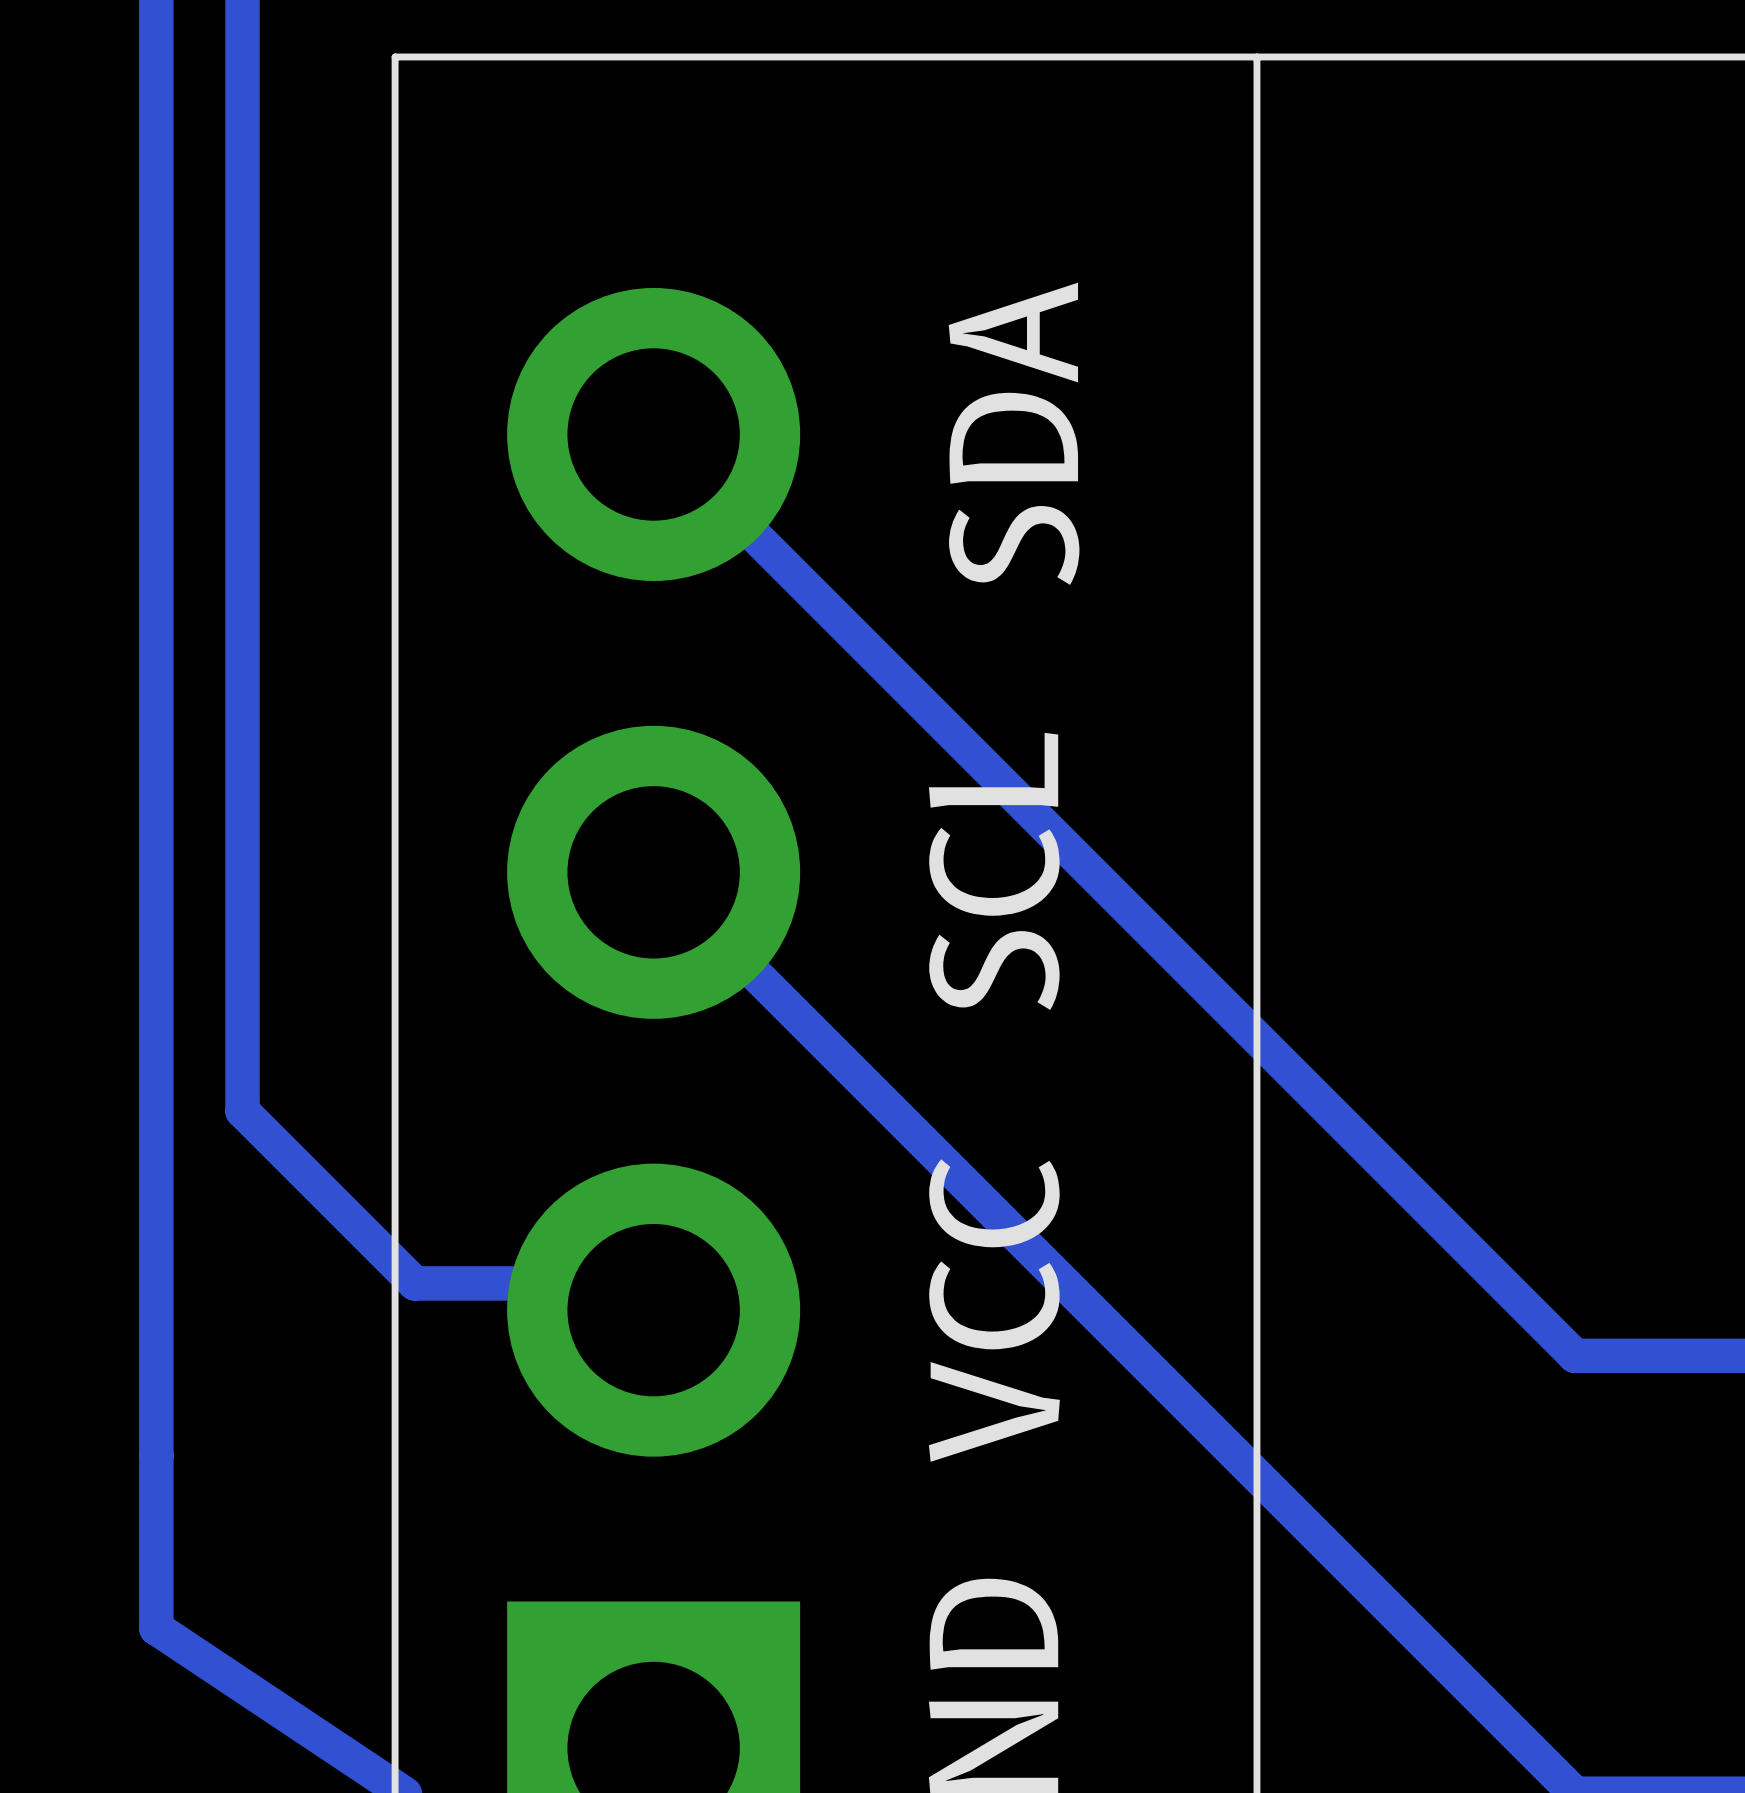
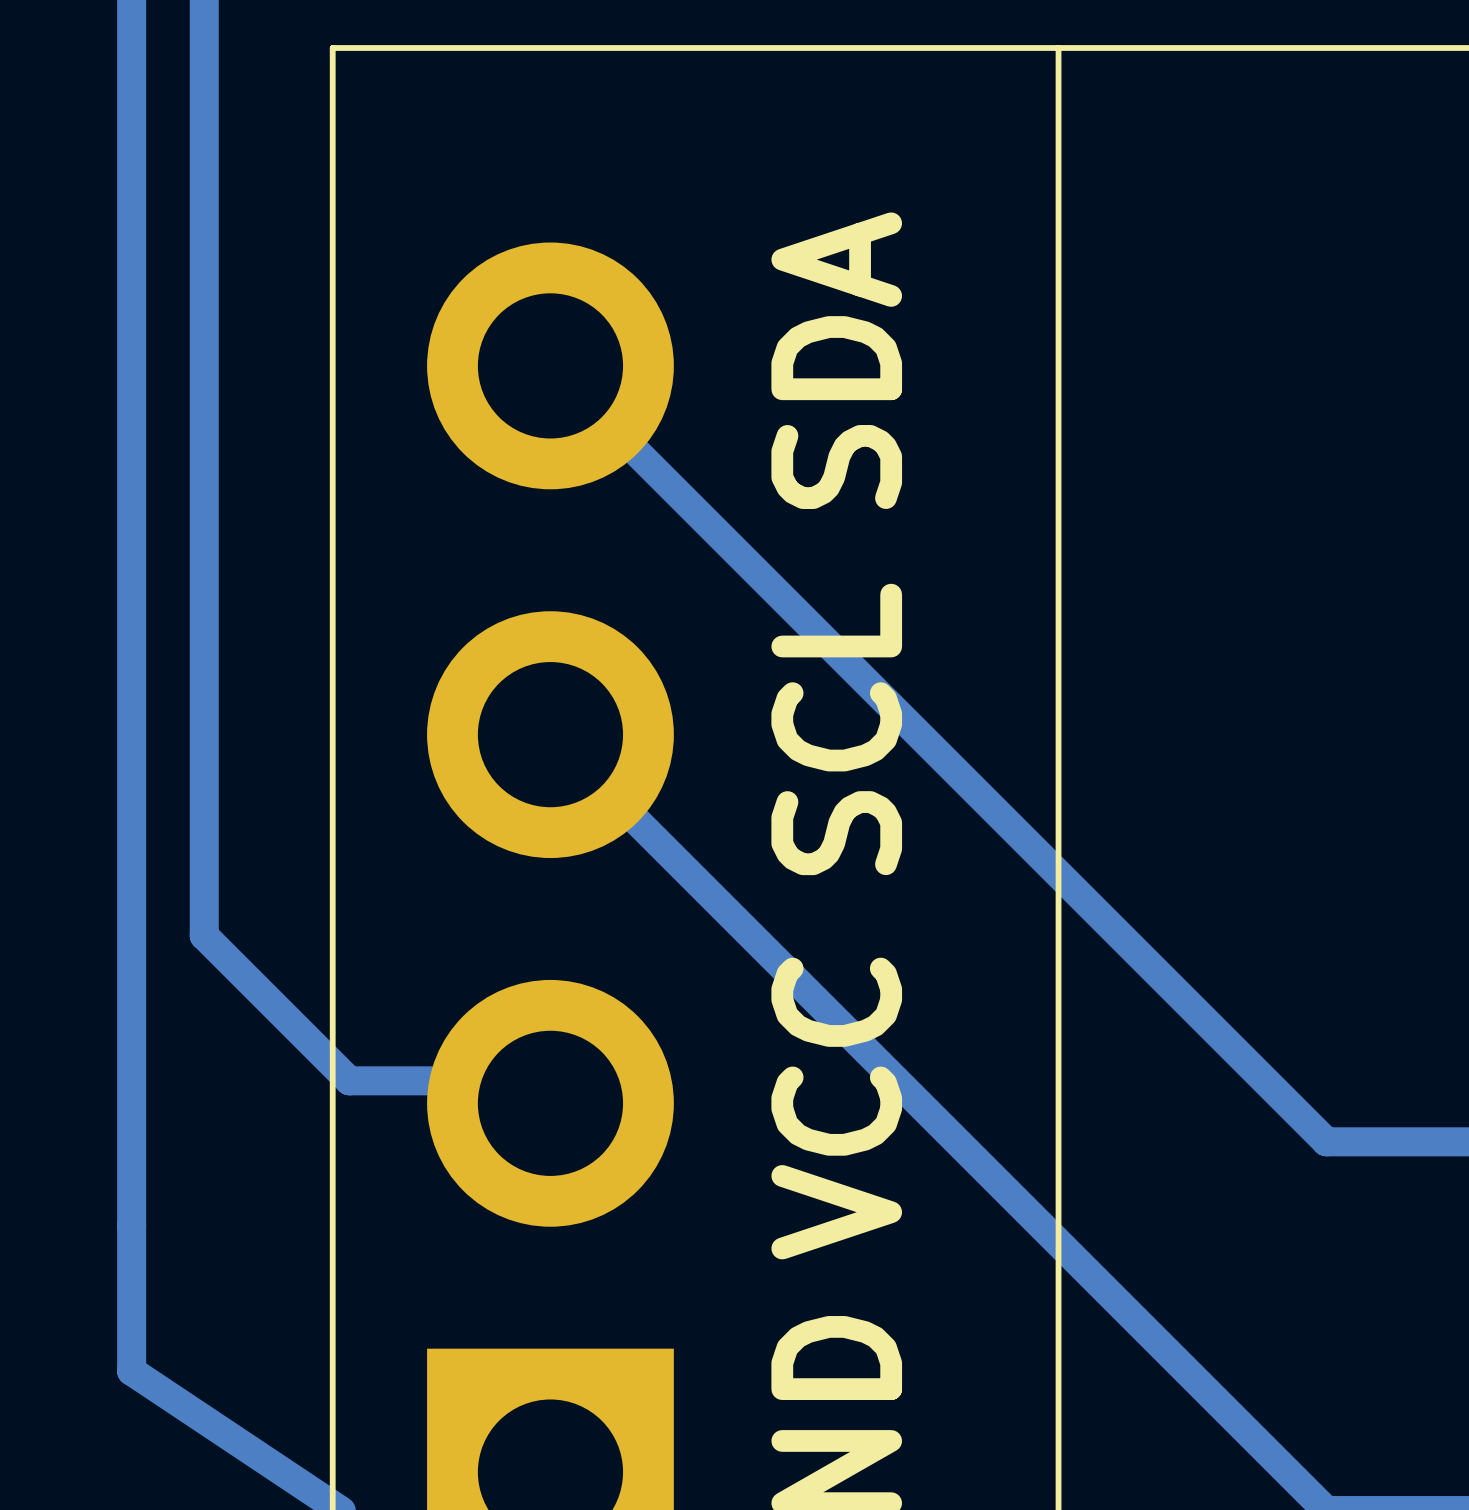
part text position: SDA (1014, 433) -> SDA (836, 360)

